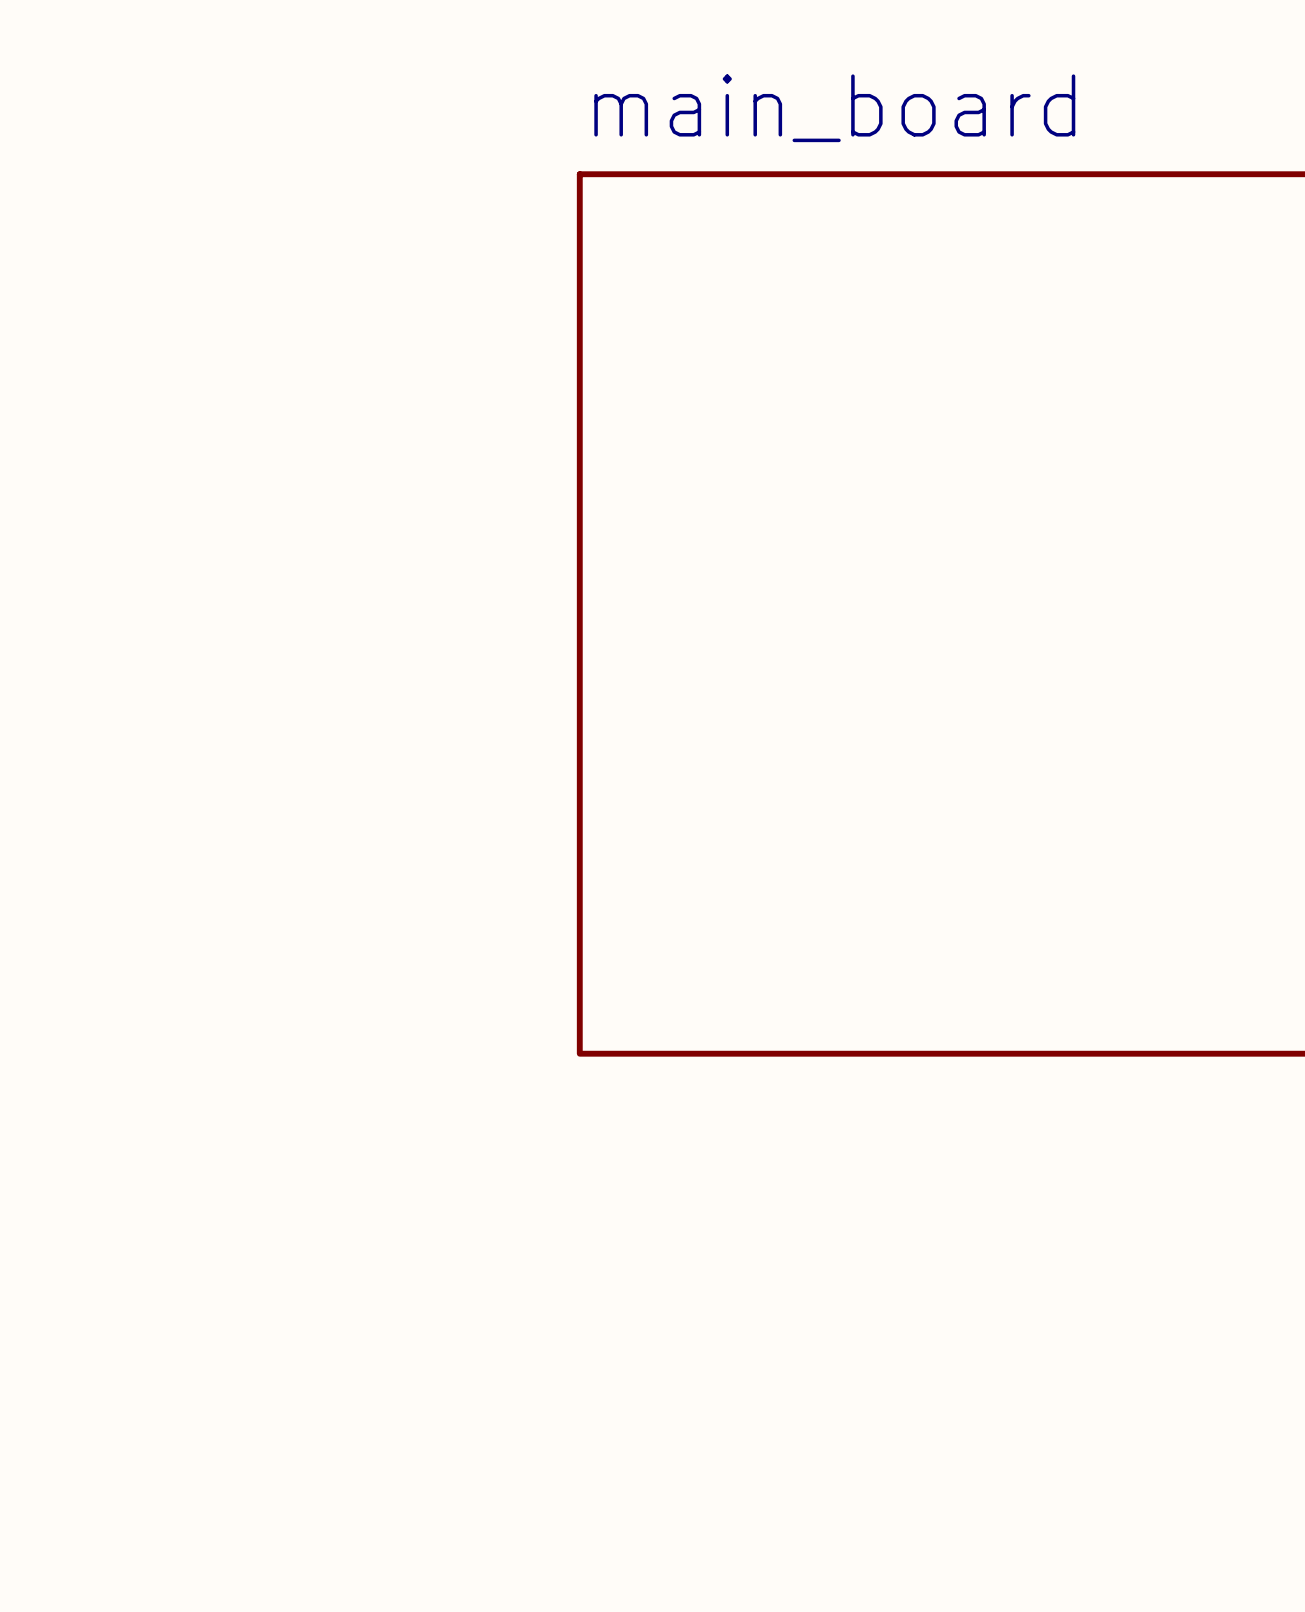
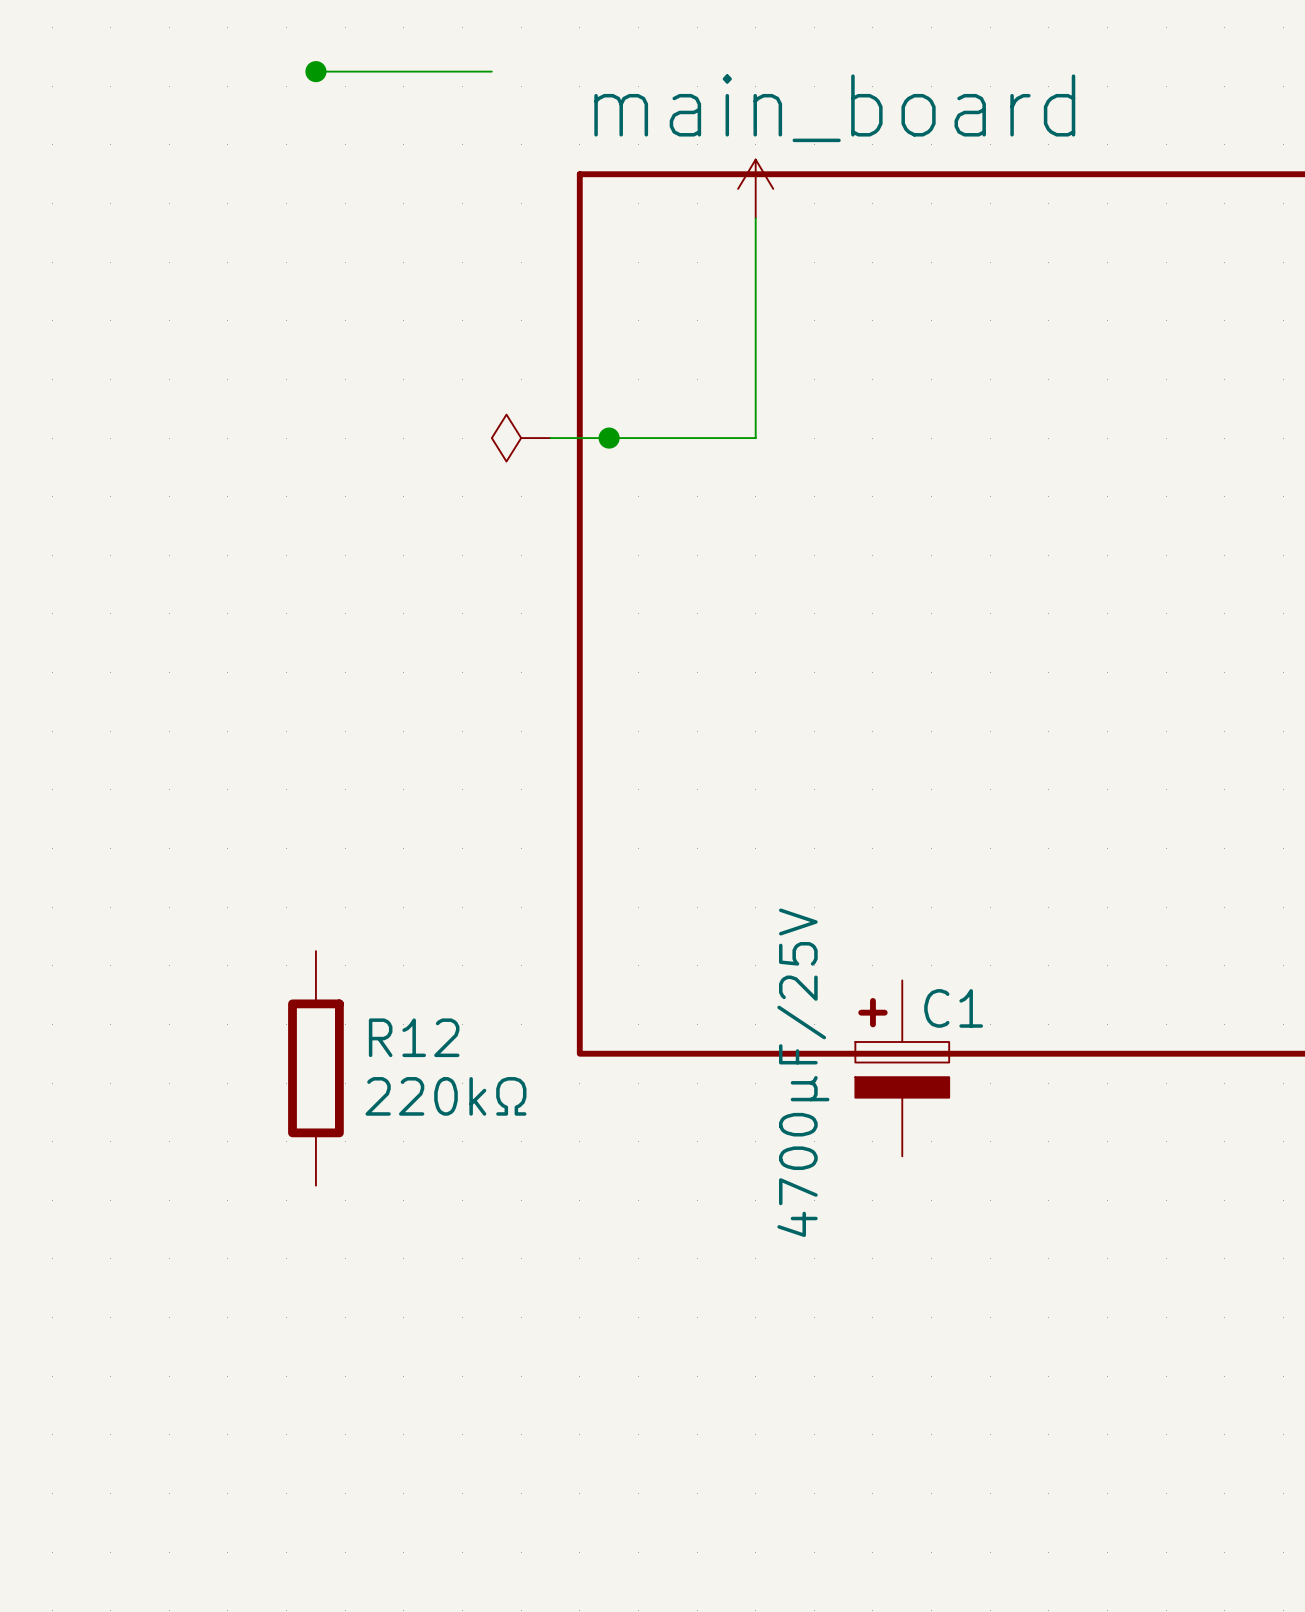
wire: none -> (315, 71) (491, 71)
junction: none -> (315, 71)
power symbol: none -> (755, 188)
wire: none -> (755, 218) (755, 438) (550, 438)
power symbol: none -> (521, 438)
junction: none -> (609, 438)
R12: none -> 220kΩ (315, 1068)
C1: none -> 4700μF/25V (902, 1068)

